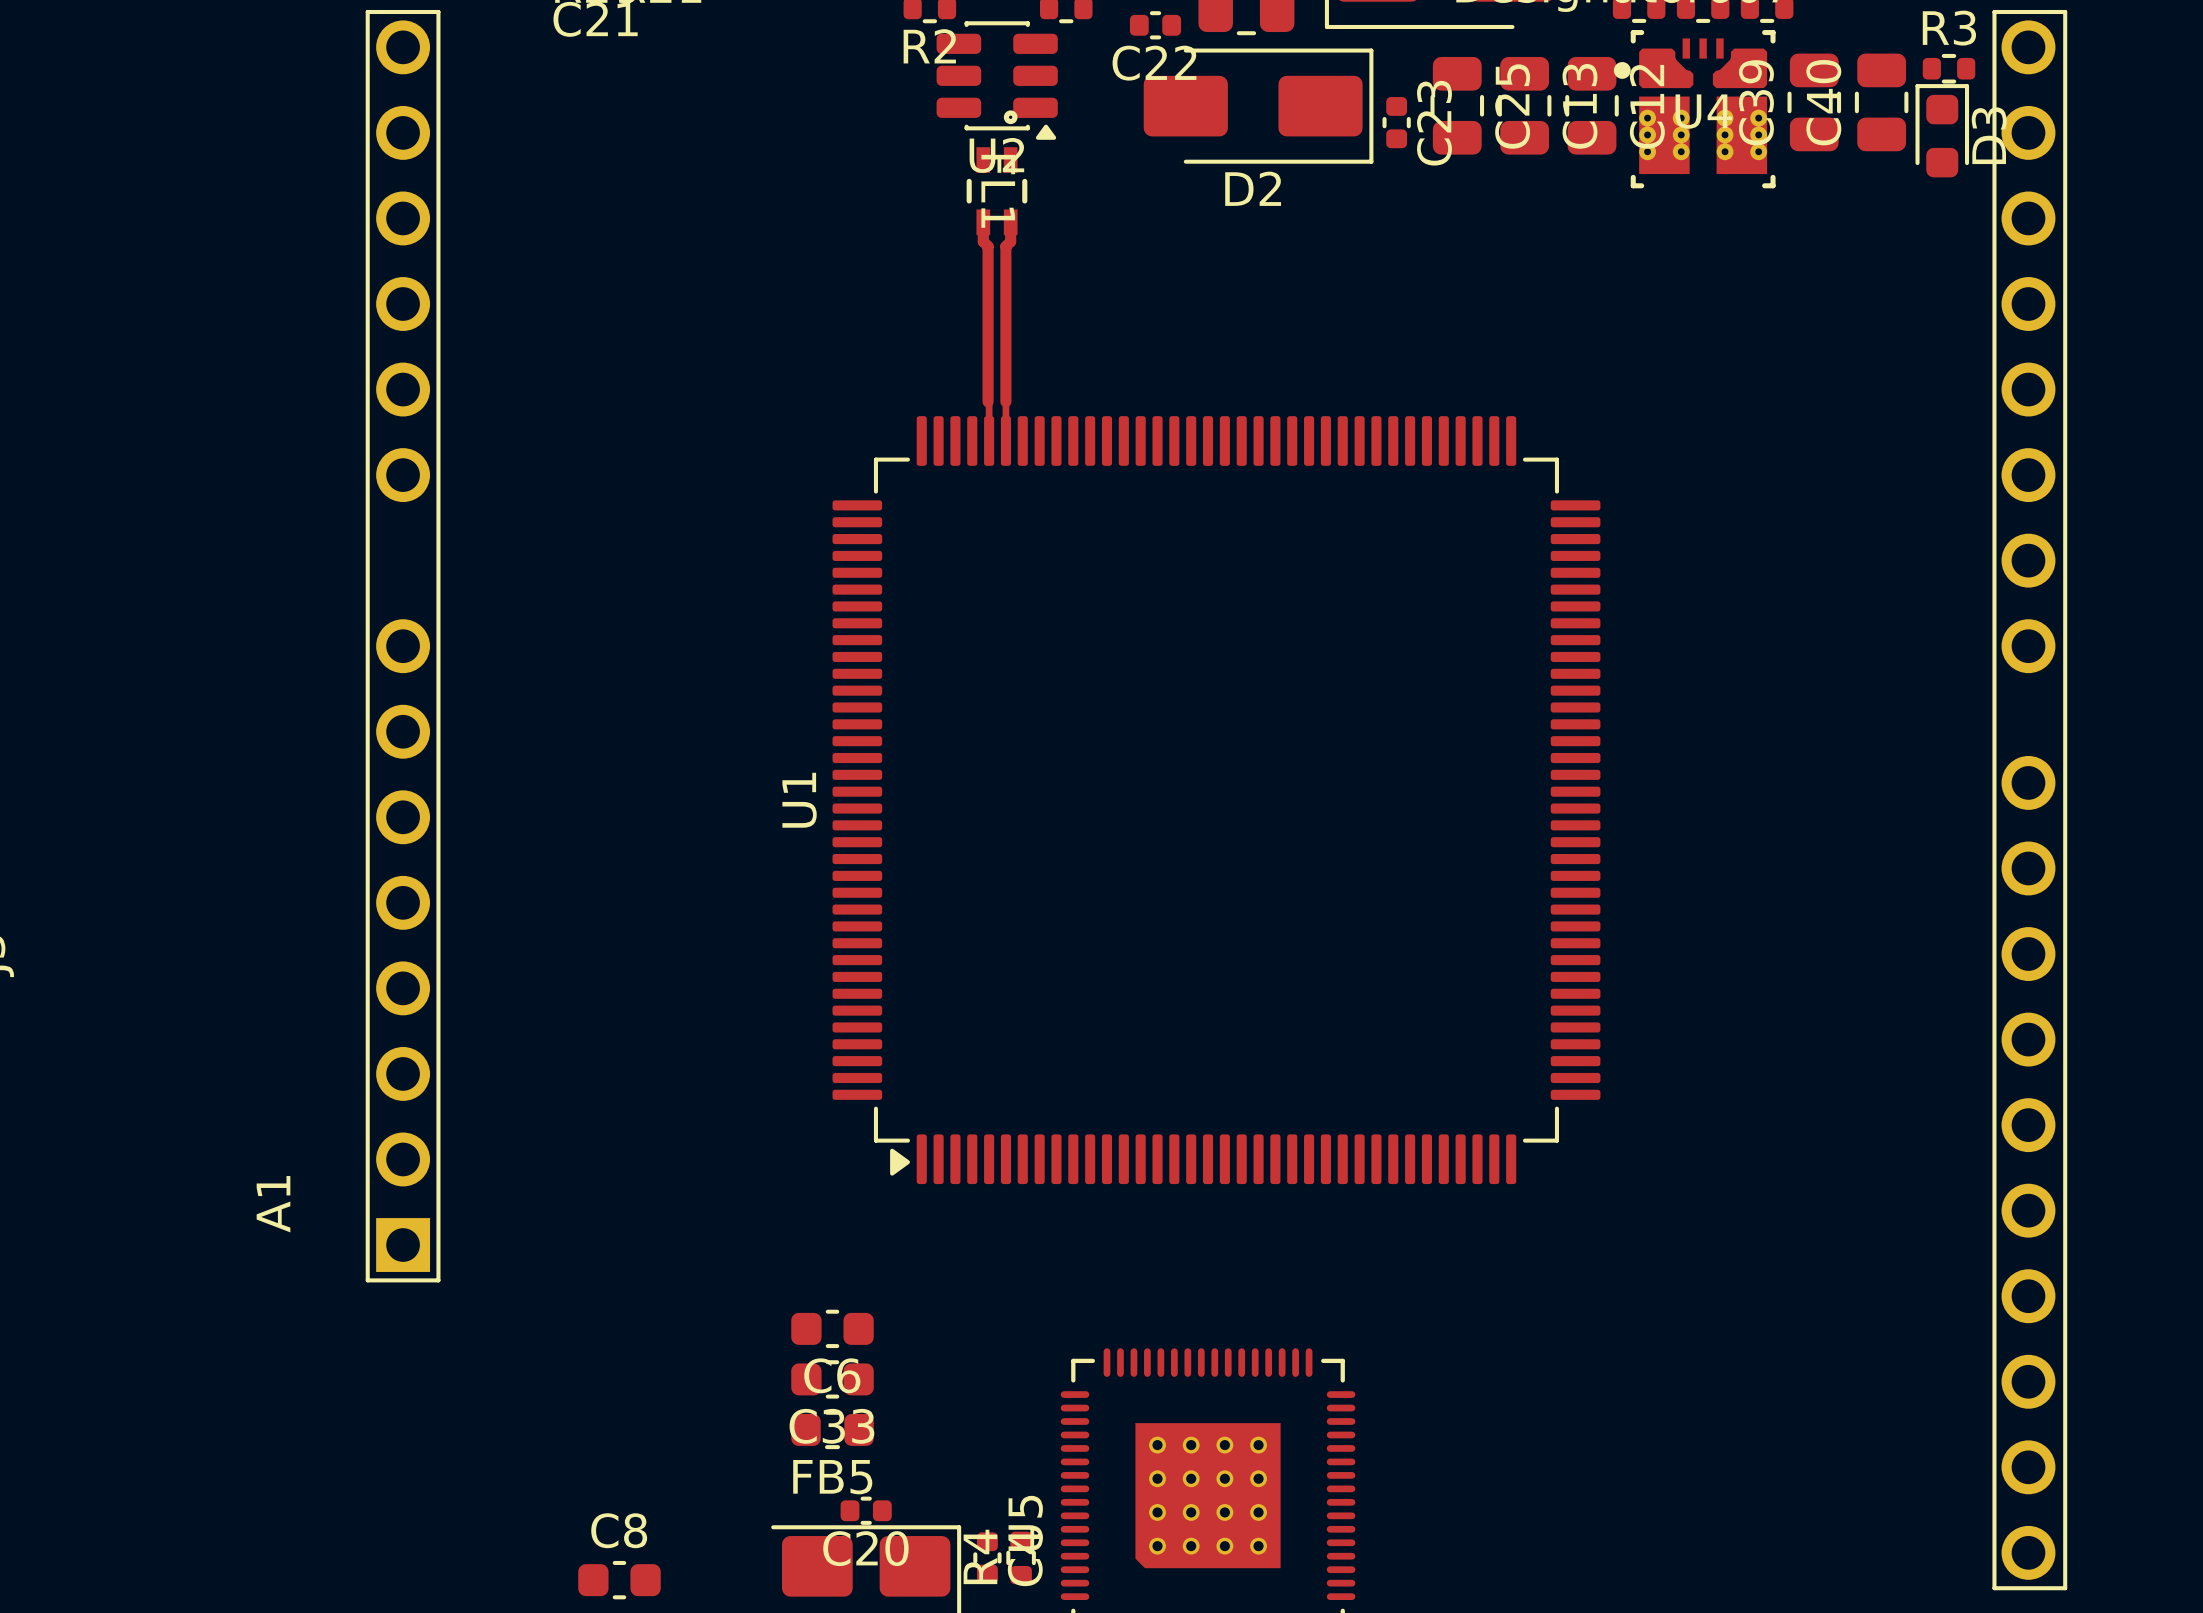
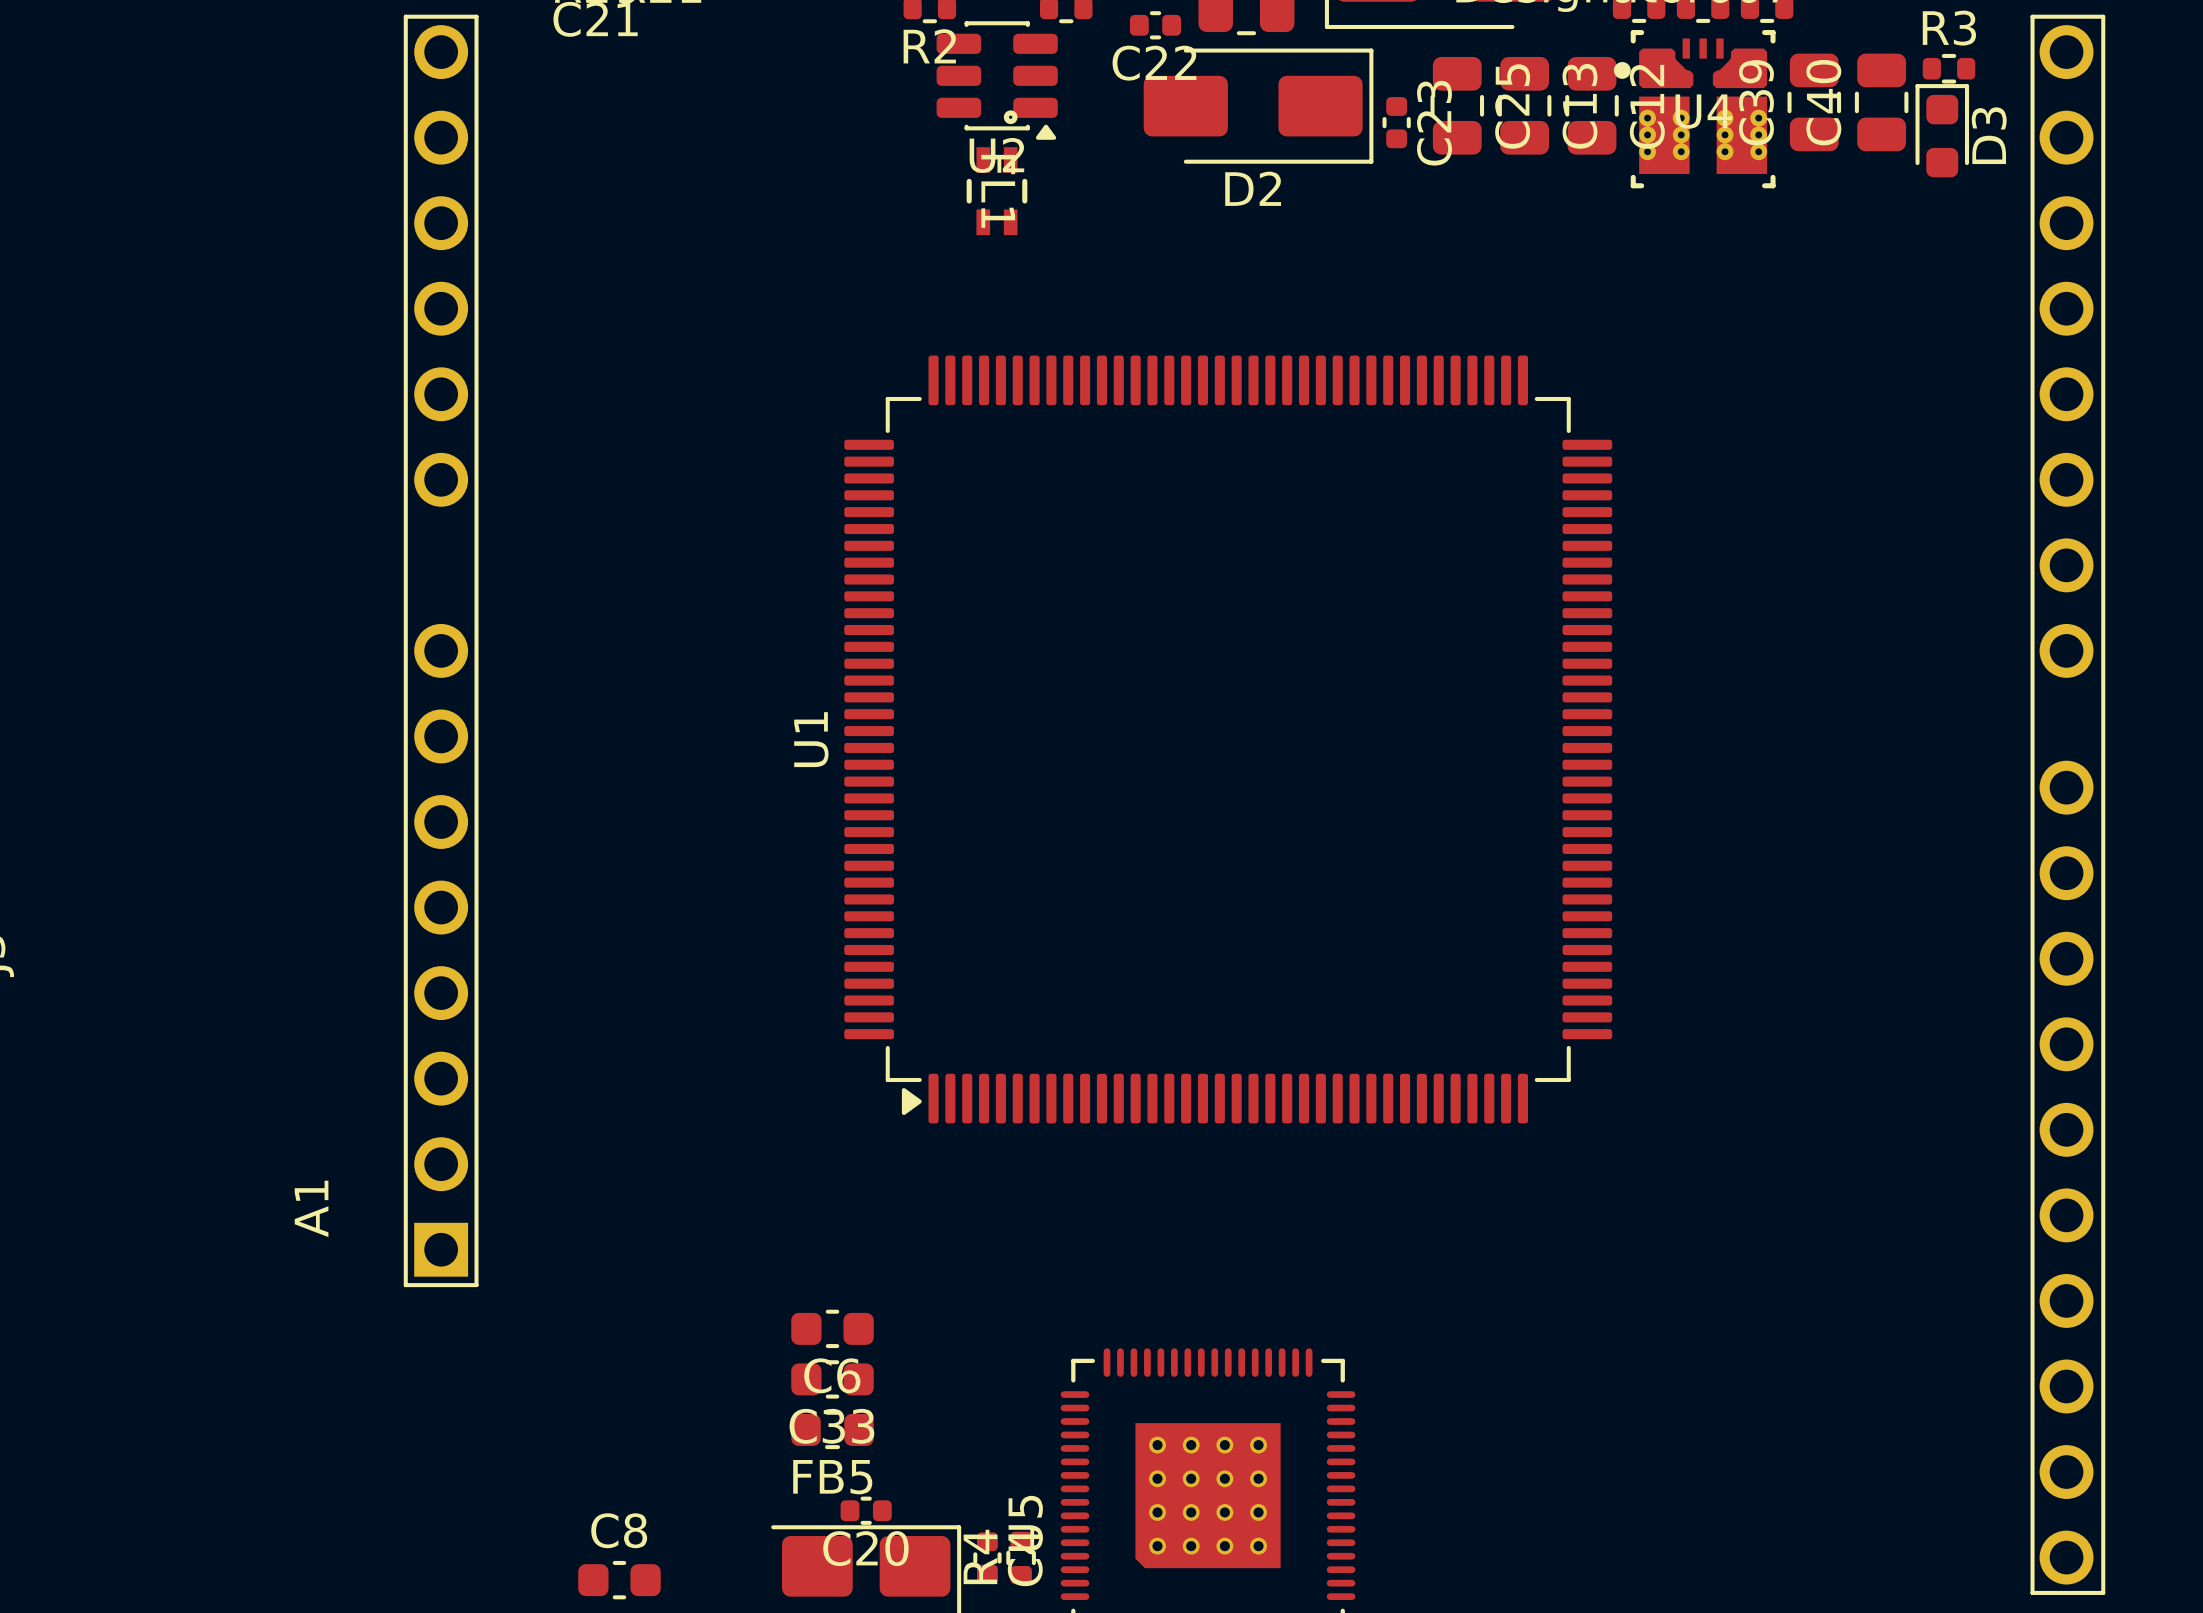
top track: (983, 222) (983, 241) (988, 246) (989, 440) -> none
top track: (1010, 222) (1010, 241) (1005, 246) (1005, 440) -> none
A1 position: (1216, 800) -> (1254, 804)
U1 position: (1216, 800) -> (1228, 739)

